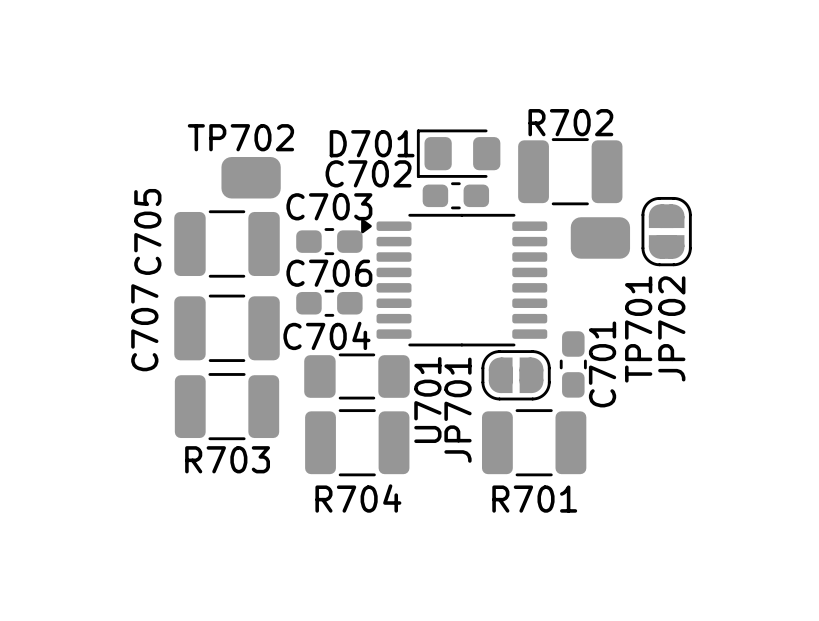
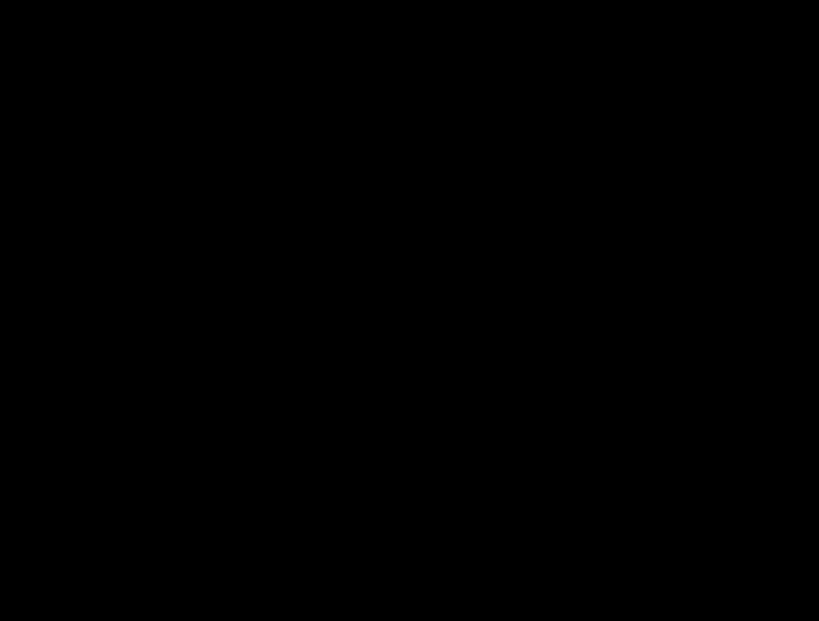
D701: (458, 153) -> none
R702: (570, 171) -> none
TP702: (251, 177) -> none
C702: (455, 195) -> none
JP702: (666, 231) -> none
TP701: (600, 237) -> none
C703: (329, 241) -> none
C705: (227, 243) -> none
U701: (454, 280) -> none
C706: (329, 303) -> none
C707: (227, 328) -> none
C701: (573, 364) -> none
JP701: (516, 375) -> none
C704: (356, 376) -> none
R703: (227, 406) -> none
R704: (357, 442) -> none
R701: (534, 442) -> none

